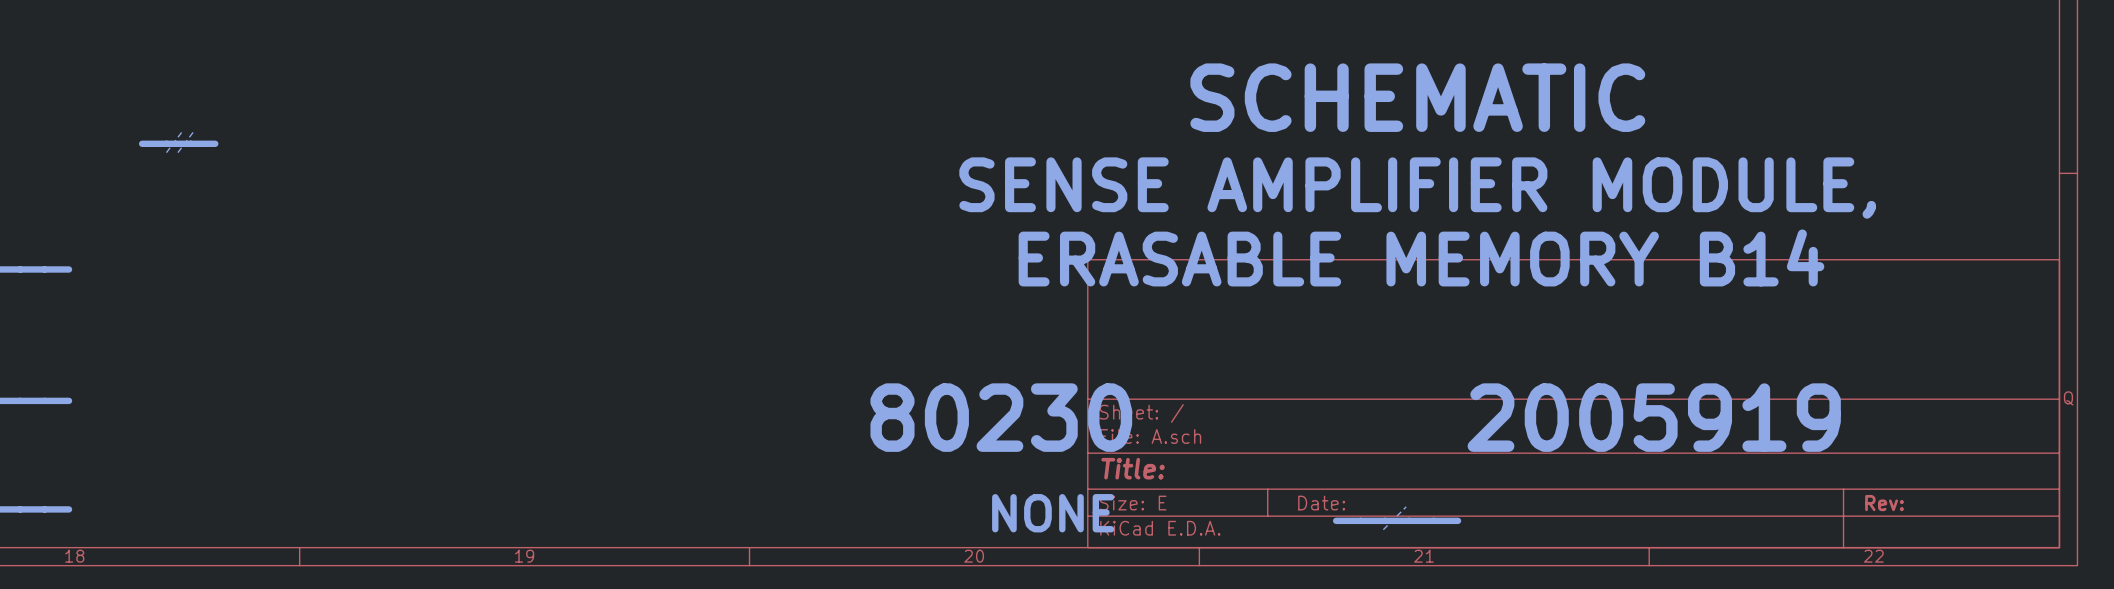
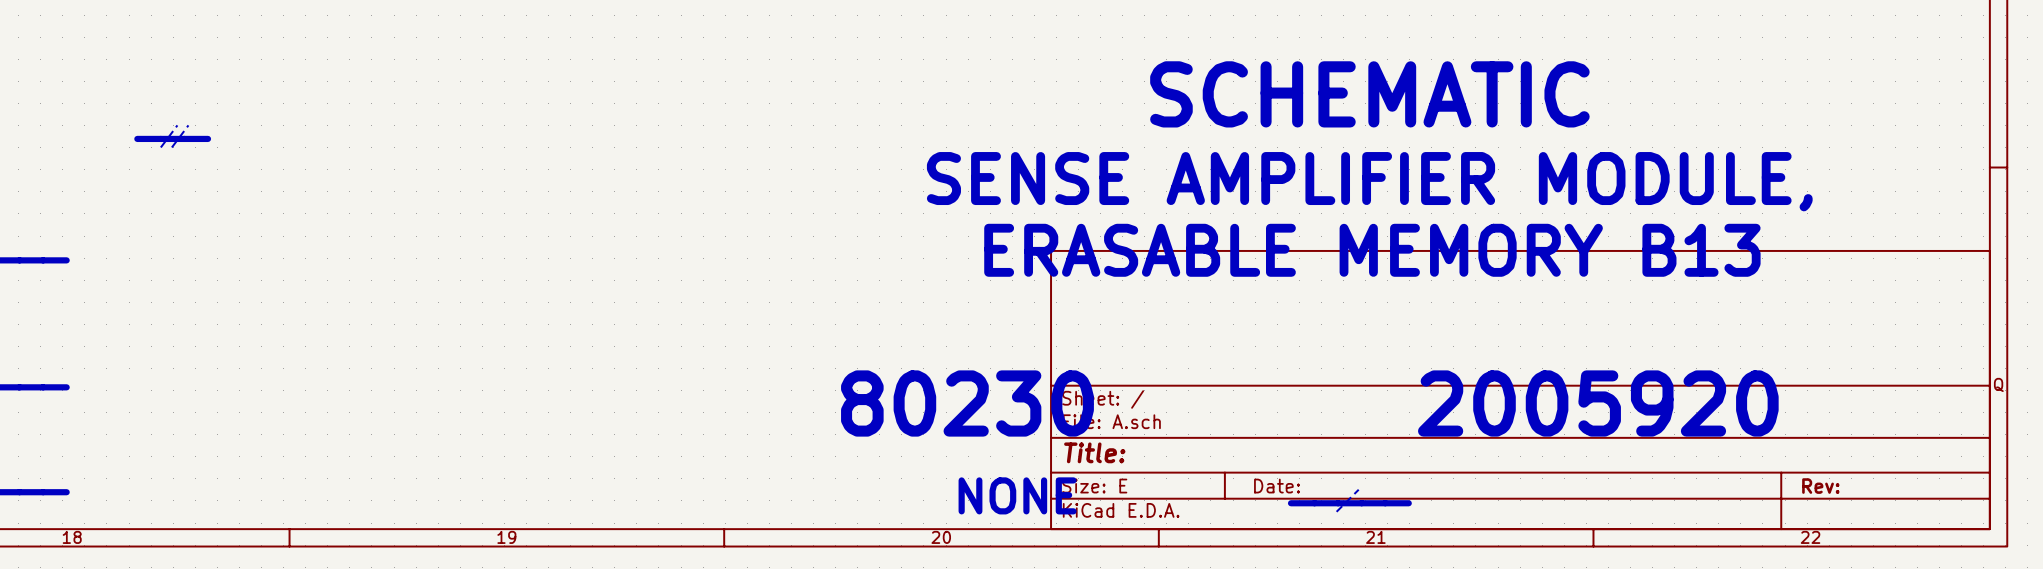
text: ERASABLE MEMORY B14 (1421, 257) -> ERASABLE MEMORY B13 (1372, 250)
text: 2005919 (1654, 417) -> 2005920 (1598, 403)

